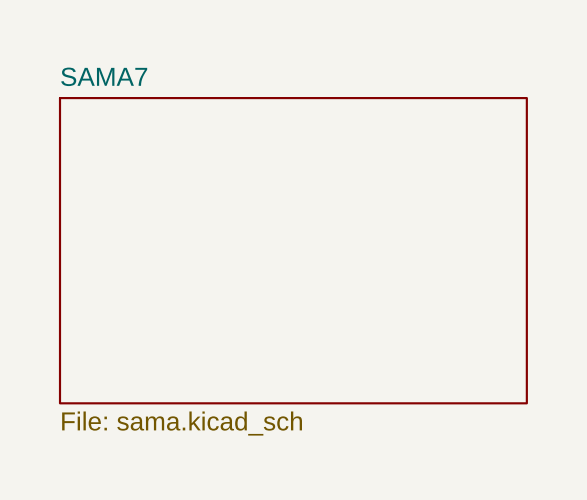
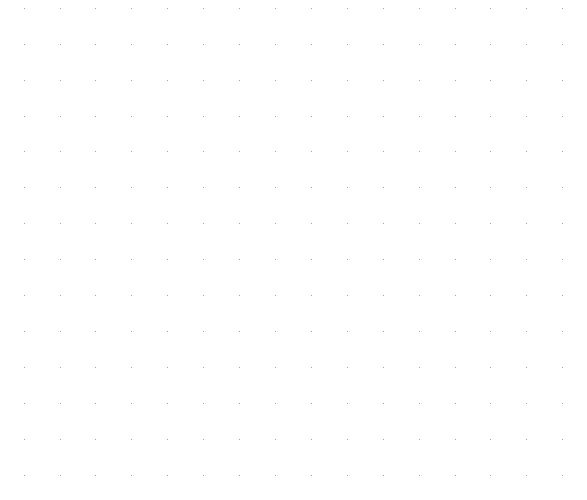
sheet SAMA7: File: sama.kicad_sch (293, 250) -> none

